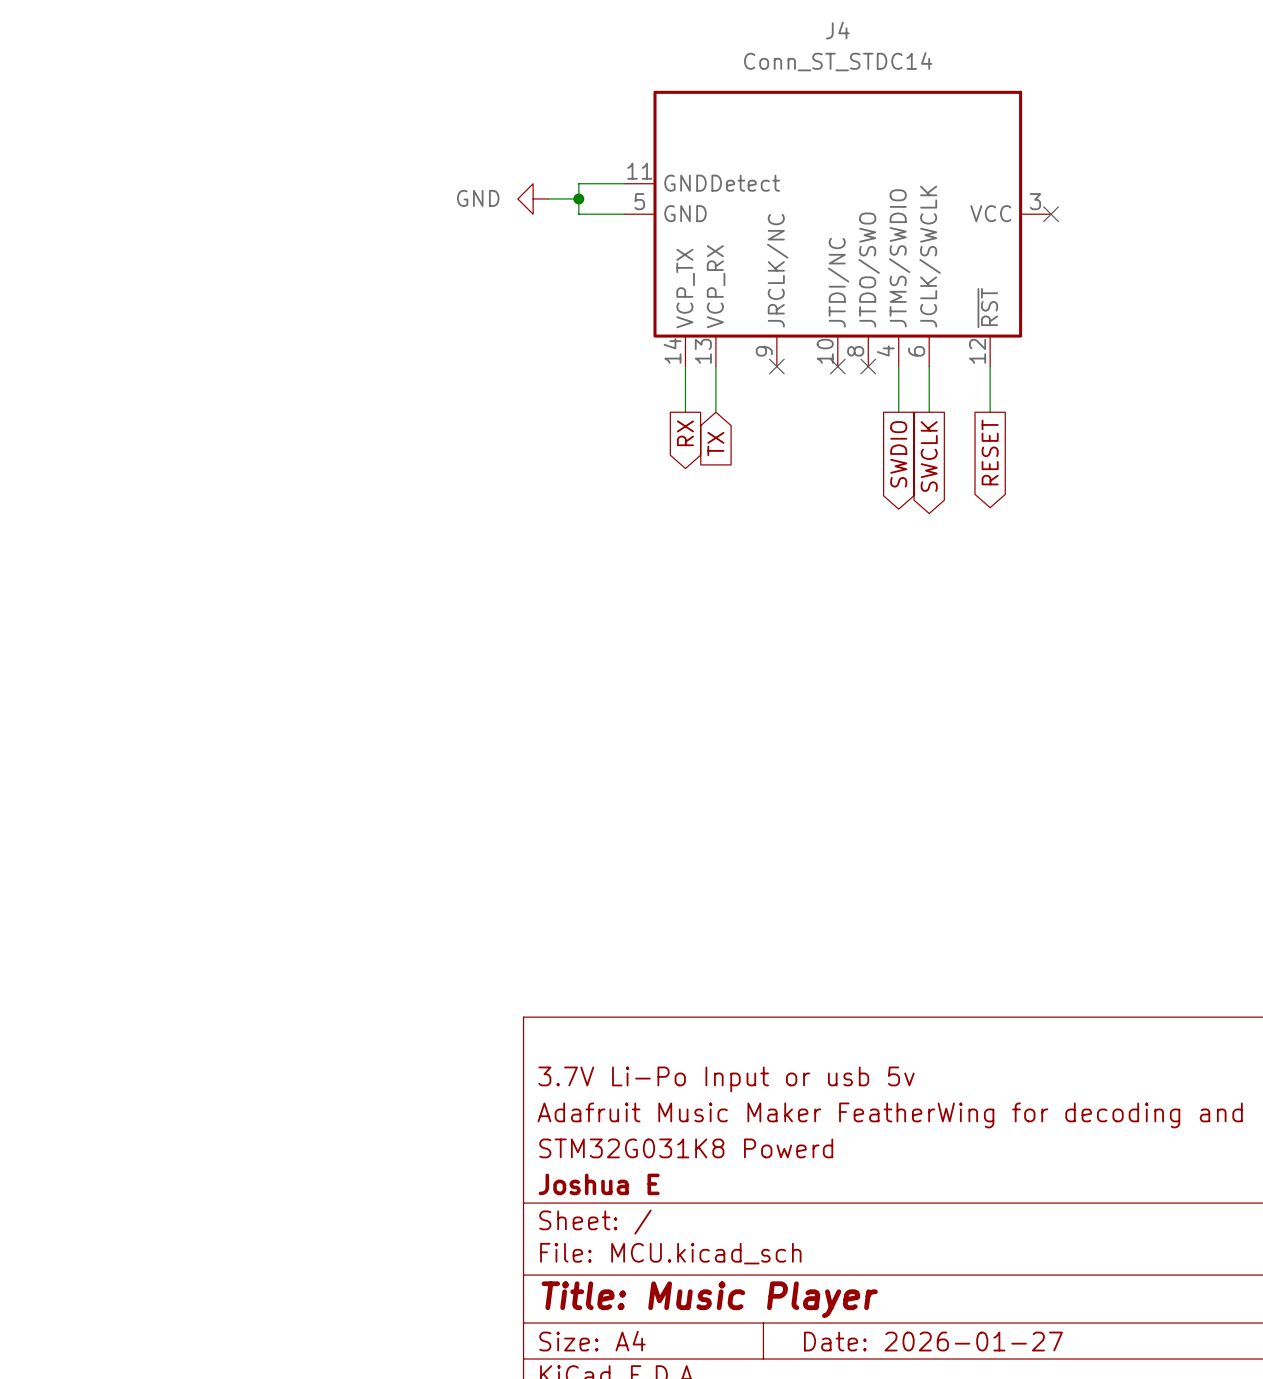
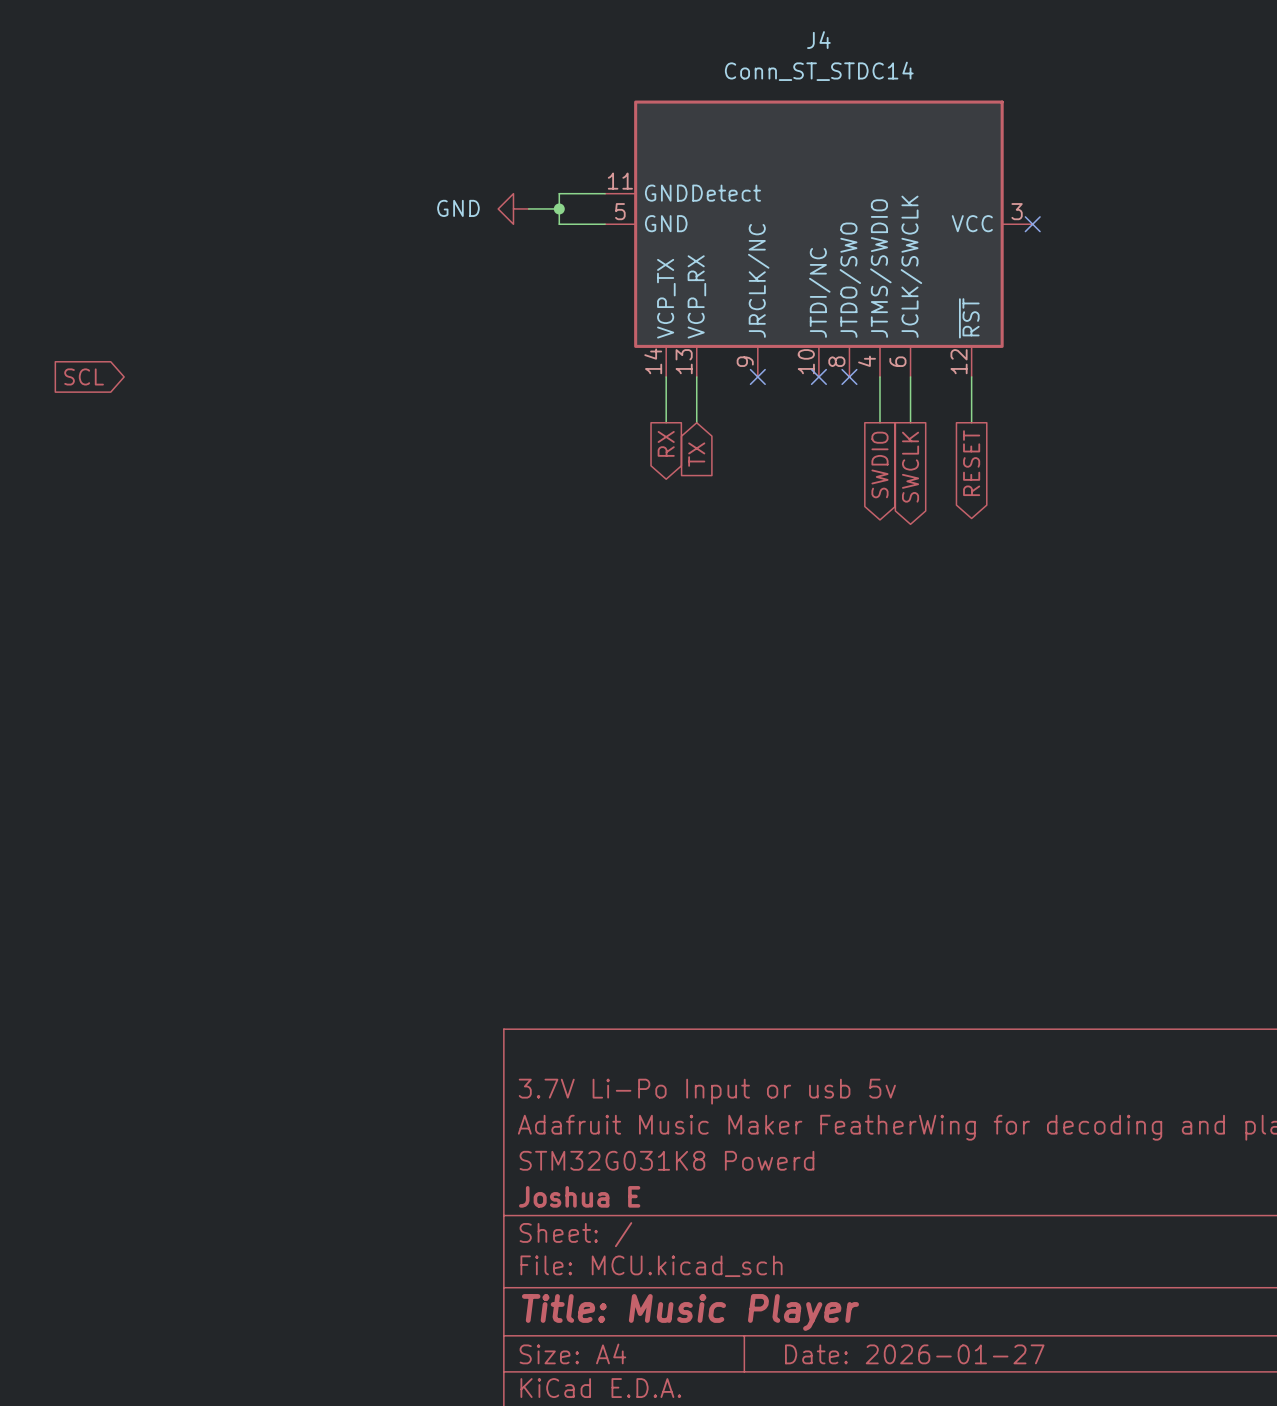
global label: none -> SCL (84, 376)

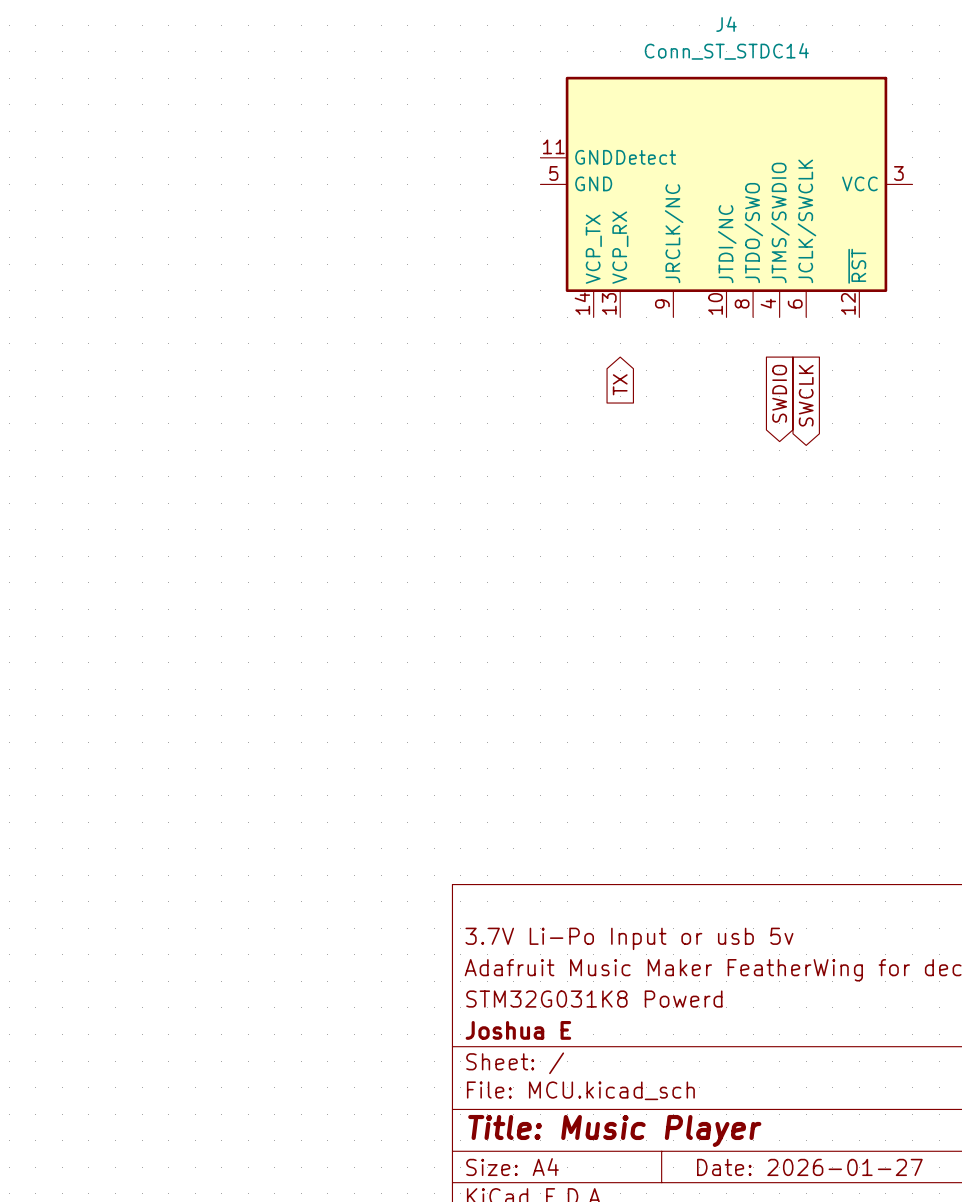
wire: (605, 193) (559, 193) (559, 224) (605, 224) -> none
power symbol: GND (513, 208) -> none
wire: (528, 208) (559, 208) -> none
junction: (559, 208) -> none
no-connect mark: (1032, 224) -> none
global label: SCL (84, 376) -> none
wire: (666, 376) (666, 422) -> none
wire: (696, 376) (696, 422) -> none
no-connect mark: (757, 376) -> none
no-connect mark: (818, 376) -> none
no-connect mark: (849, 376) -> none
wire: (879, 376) (879, 422) -> none
wire: (910, 376) (910, 422) -> none
wire: (971, 376) (971, 422) -> none
global label: RX (666, 443) -> none
global label: RESET (971, 463) -> none

